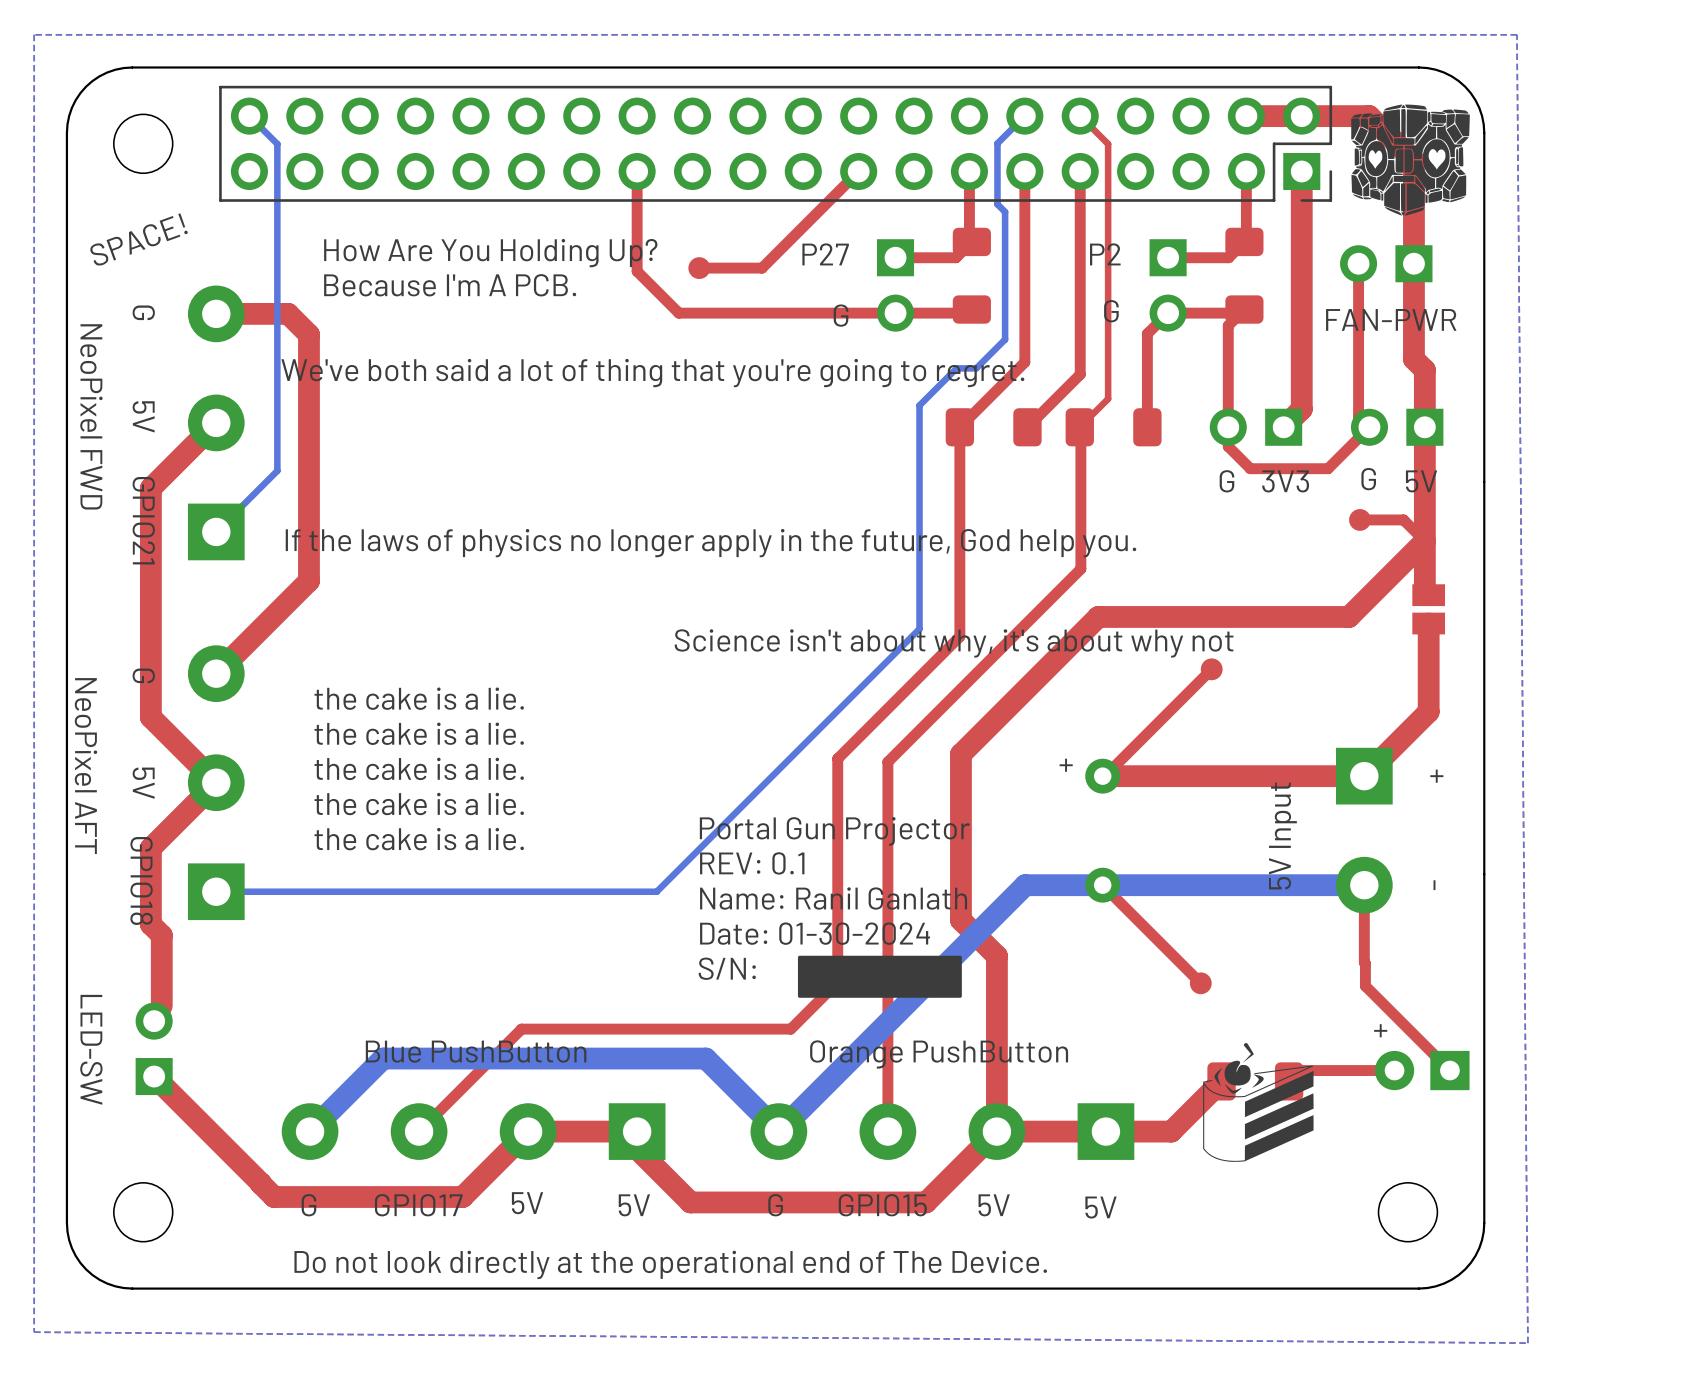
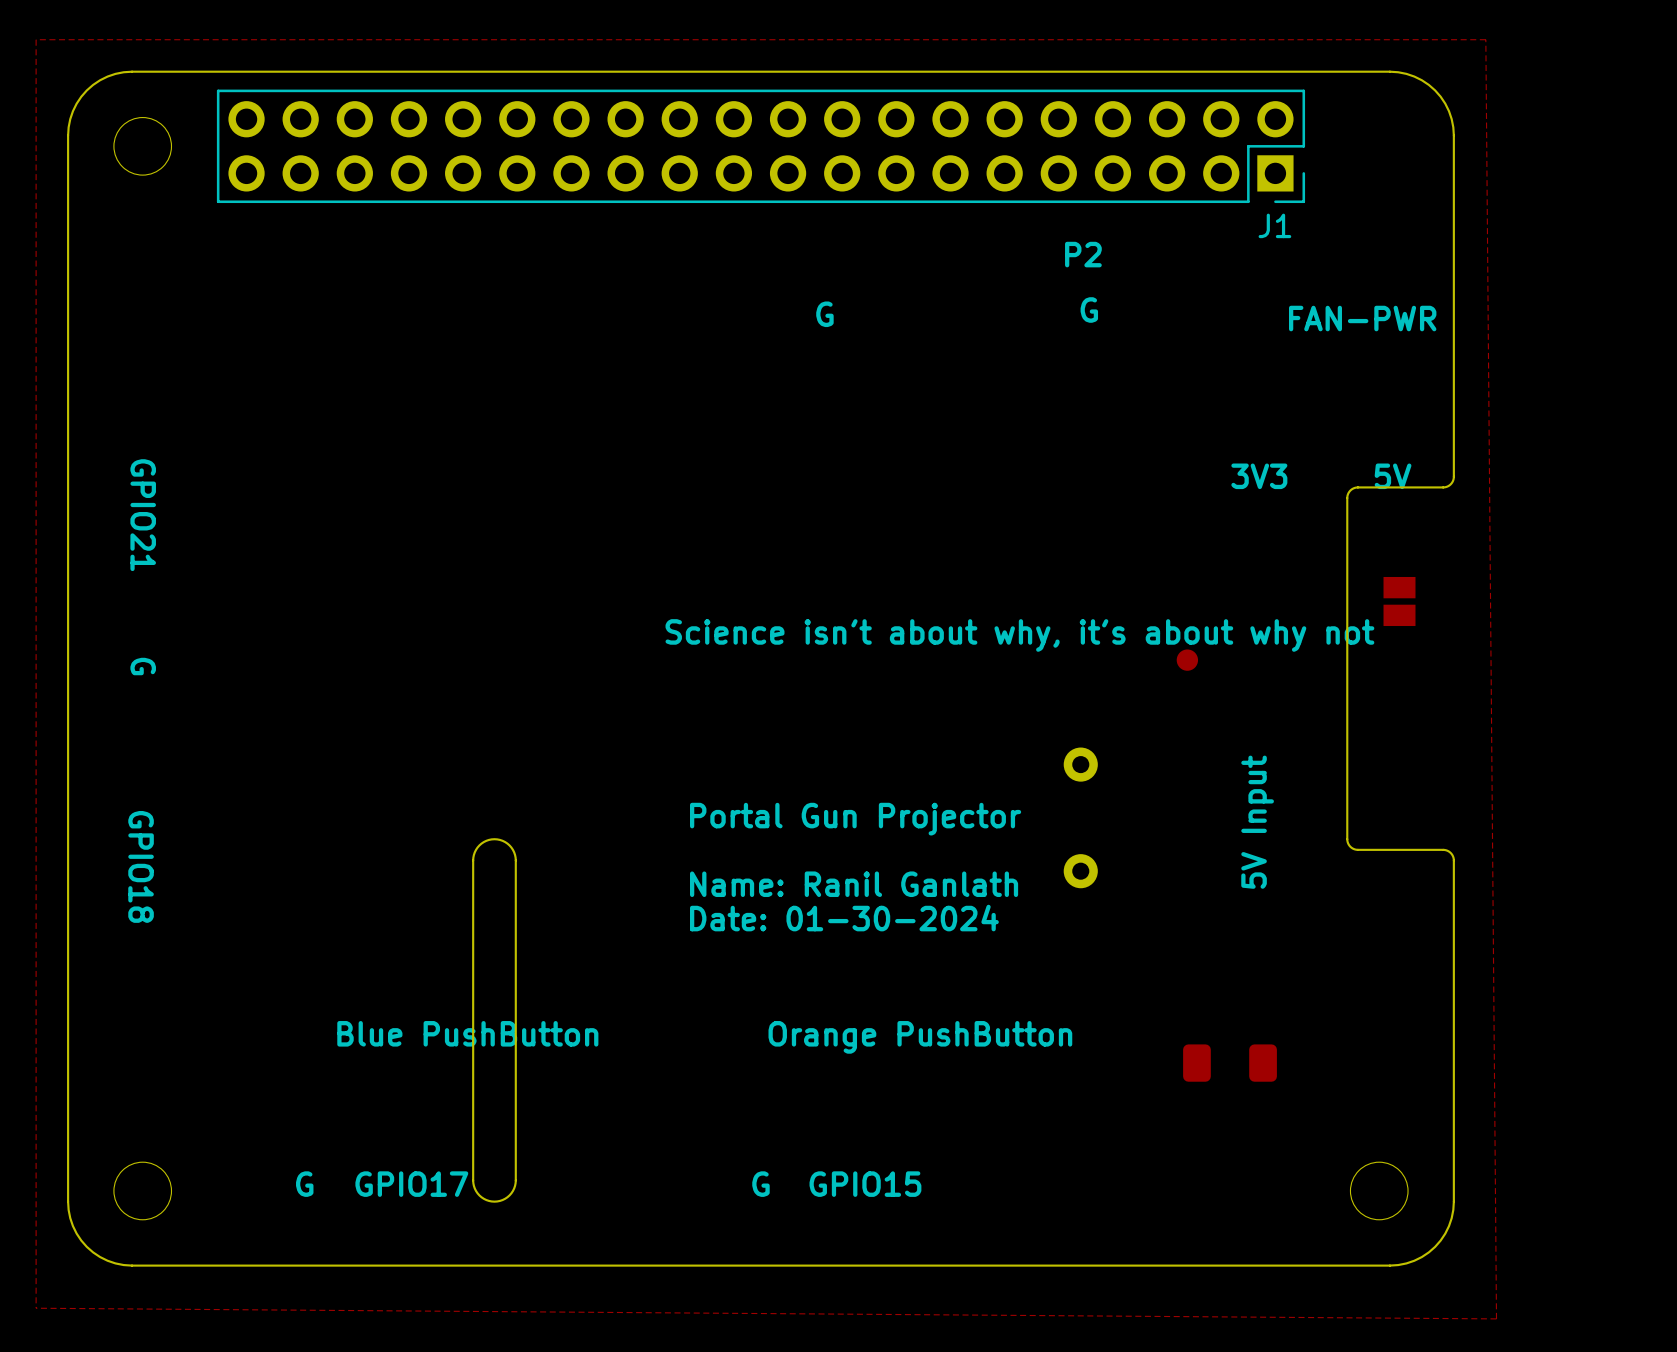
bottom zone outline: (1516, 34) (34, 34) (34, 1332) (1527, 1343) (1516, 34) -> none
drawing: [1351, 104, 1470, 216] -> none
bottom track: (249, 116) (277, 144) (277, 470) (216, 531) -> none
bottom track: (1024, 116) (997, 143) (997, 204) (1005, 211) (1005, 339) (976, 368) (956, 368) (919, 405) (919, 628) (656, 891) (216, 891) -> none
top track: (1080, 116) (1108, 144) (1108, 398) (1079, 427) (1080, 569) (887, 761) (887, 1131) -> none
top track: (1246, 116) (1369, 116) (1413, 160) (1413, 359) (1424, 370) (1424, 591) (1428, 595) -> none
top track: (637, 171) (637, 271) (678, 313) (968, 313) (971, 309) -> none
top track: (858, 171) (762, 268) (699, 268) -> none
top track: (969, 171) (969, 239) (971, 241) (956, 257) (895, 257) -> none
top track: (1024, 171) (1024, 362) (959, 427) (959, 636) (837, 758) (837, 982) (790, 1029) (521, 1029) (419, 1131) -> none
top track: (1080, 171) (1080, 374) (1027, 427) -> none
top track: (1246, 171) (1246, 239) (1228, 257) (1168, 257) -> none
top track: (1301, 171) (1301, 409) (1283, 427) -> none
J1 name: none -> J1 (1274, 225)
text: SPACE! (138, 239) -> none
text: How Are You Holding Up? (490, 253) -> none
text: P27 (825, 254) -> none
top track: (1358, 263) (1358, 416) (1369, 427) (1328, 468) (1250, 468) (1228, 446) (1228, 325) (1244, 309) -> none
part: (1386, 263) -> none
part: (699, 268) -> none
part: (971, 275) -> none
part: (1244, 275) -> none
text: Because I'm A PCB. (450, 285) -> none
part: (895, 285) -> none
part: (1168, 285) -> none
text: G (143, 312) -> none
top track: (216, 313) (288, 313) (308, 334) (308, 581) (216, 673) -> none
top track: (1240, 313) (1168, 313) (1147, 333) (1147, 427) -> none
text: We've both said a lot of thing that you're going to regret. (652, 373) -> none
text: NeoPixel FWD (91, 416) -> none
text: 5V (143, 416) -> none
top track: (216, 422) (150, 488) (150, 717) (216, 782) (150, 848) (150, 924) (161, 935) (161, 1005) -> none
part: (216, 422) -> none
part: (993, 427) -> none
part: (1113, 427) -> none
part: (1255, 427) -> none
part: (1397, 427) -> none
text: G (1368, 479) -> none
text: G (1226, 481) -> none
board edge: (1484, 481) (1484, 874) -> (1453, 476) (1451, 483) (1444, 487) (1355, 487) (1349, 491) (1347, 498) (1347, 841) (1350, 846) (1356, 849) (1444, 849) (1450, 852) (1453, 860)
top track: (1359, 519) (1403, 519) (1424, 541) (1349, 616) (1098, 616) (960, 754) (960, 920) (996, 956) (996, 1131) -> none
part: (1359, 519) -> none
text: If the laws of physics no longer apply in the future, God help you. (710, 543) -> none
top track: (1428, 623) (1428, 711) (1364, 776) (1102, 776) (1104, 776) (1211, 669) -> none
text: the cake is a lie. (419, 698) -> none
text: the cake is a lie. (419, 733) -> none
text: + (1066, 765) -> none
text: NeoPixel AFT (85, 766) -> none
text: the cake is a lie. (419, 768) -> none
text: + (1436, 776) -> none
part: (216, 782) -> none
text: 5V (143, 783) -> none
text: the cake is a lie. (419, 804) -> none
part: (1364, 830) -> none
text: the cake is a lie. (419, 839) -> none
text: REV: 0.1 (752, 863) -> none
board edge: none -> (515, 860) (515, 1183) (512, 1190) (507, 1197) (500, 1200) (491, 1201) (483, 1198) (477, 1193) (473, 1180) (473, 857) (479, 845) (486, 840) (494, 839) (502, 840) (509, 845) (514, 852) (515, 860)
top track: (1102, 885) (1200, 983) -> none
top track: (1364, 885) (1365, 986) (1449, 1070) -> none
bottom track: (1364, 885) (1025, 885) (778, 1131) (705, 1058) (383, 1058) (310, 1131) -> none
text: - (1434, 885) -> none
drawing: [797, 955, 962, 998] -> none
text: S/N: (727, 968) -> none
part: (1200, 983) -> none
text: + (1380, 1030) -> none
drawing: [1203, 1043, 1314, 1162] -> none
part: (154, 1048) -> none
text: LED-SW (91, 1049) -> none
top track: (1394, 1070) (1300, 1070) (1289, 1081) -> none
part: (1422, 1070) -> none
top track: (154, 1076) (274, 1197) (462, 1197) (528, 1131) (637, 1131) (637, 1149) (690, 1202) (926, 1202) (996, 1131) -> none
top track: (1221, 1081) (1171, 1131) (996, 1131) -> none
part: (473, 1131) -> none
part: (942, 1131) -> none
text: 5V (527, 1203) -> none
text: 5V (634, 1205) -> none
text: 5V (994, 1205) -> none
text: 5V (1101, 1207) -> none
text: Do not look directly at the operational end of The Device. (670, 1264) -> none

